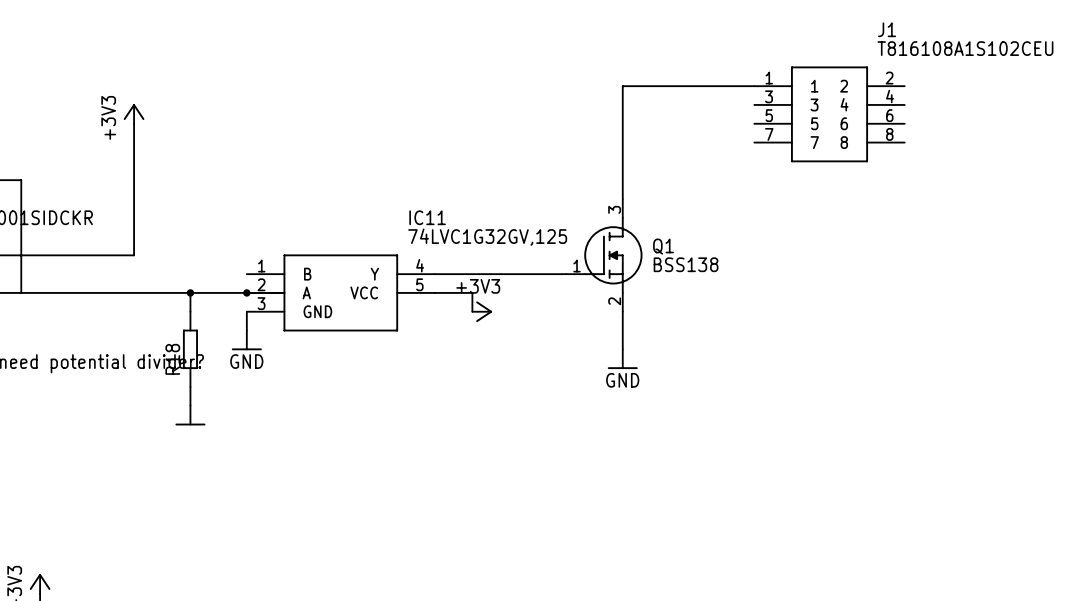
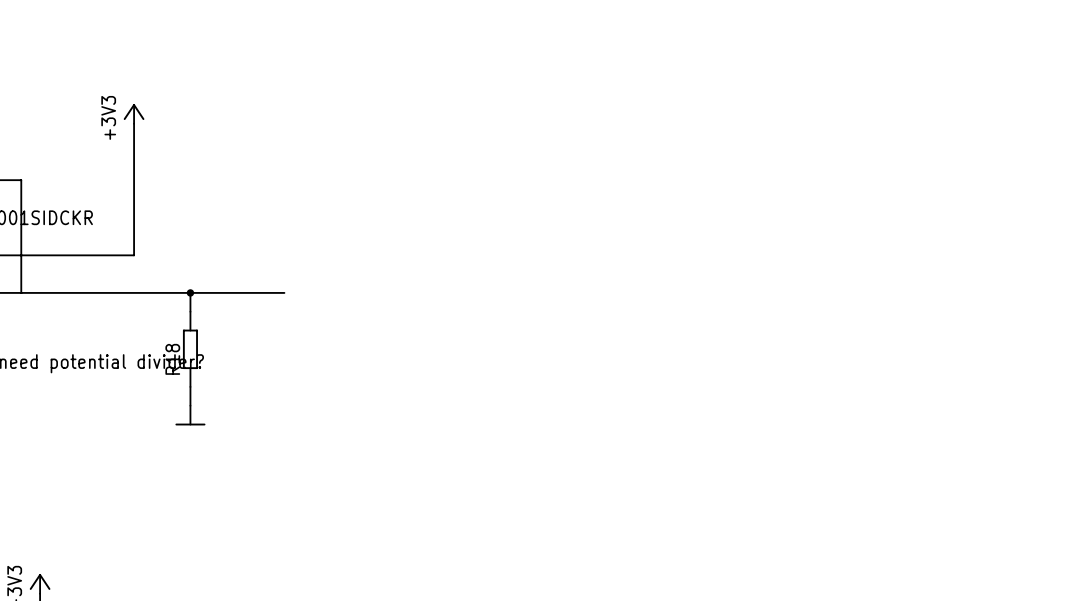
wire: (754, 86) (622, 86) (622, 198) -> none
J1: T816108A1S102CEU (829, 114) -> none
Q1: BSS138 (604, 255) -> none
wire: (434, 274) (566, 274) -> none
junction: (246, 292) -> none
IC11: 74LVC1G32GV,125 (340, 292) -> none
wire: (434, 292) (472, 292) (472, 311) -> none
wire: (246, 311) (246, 330) -> none
power symbol: +3V3 (482, 311) -> none
wire: (622, 311) (622, 349) -> none
power symbol: GND (246, 340) -> none
power symbol: GND (622, 359) -> none

